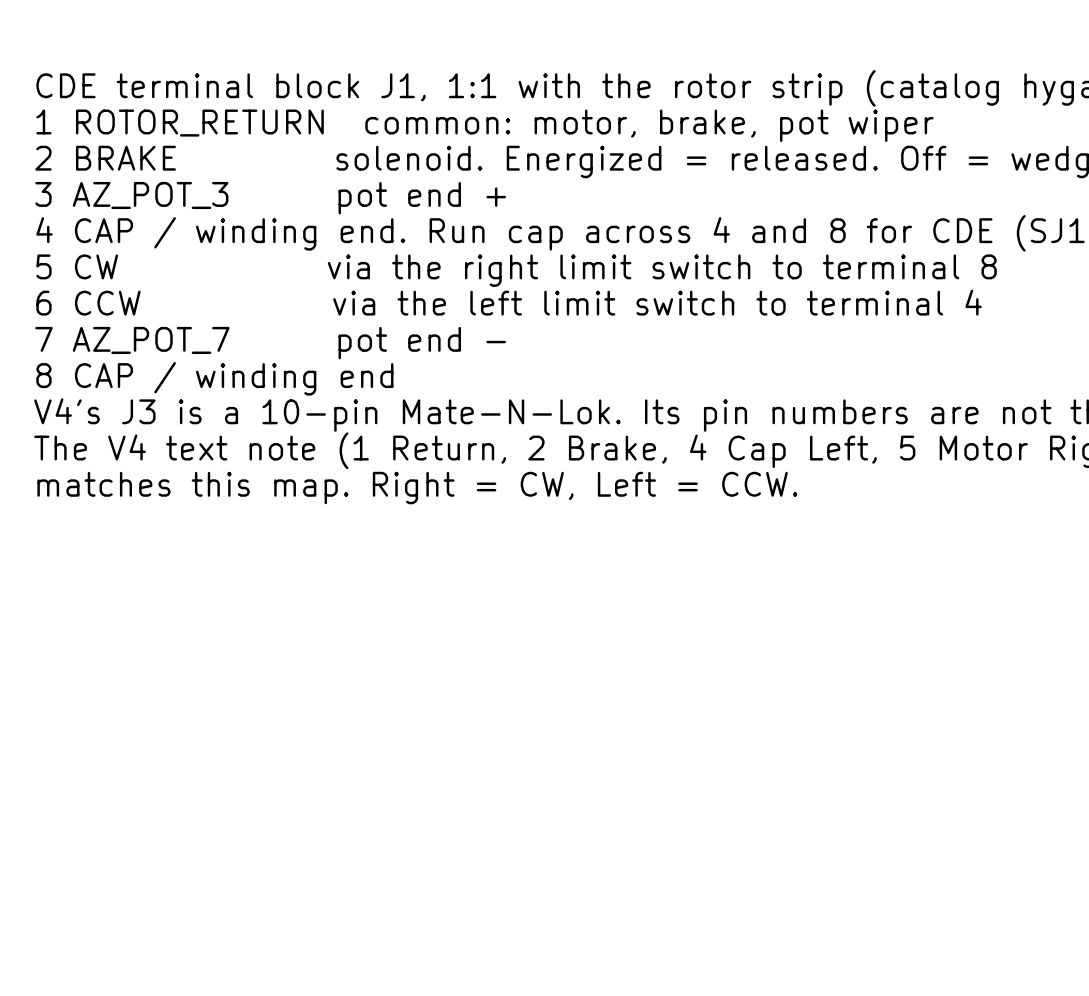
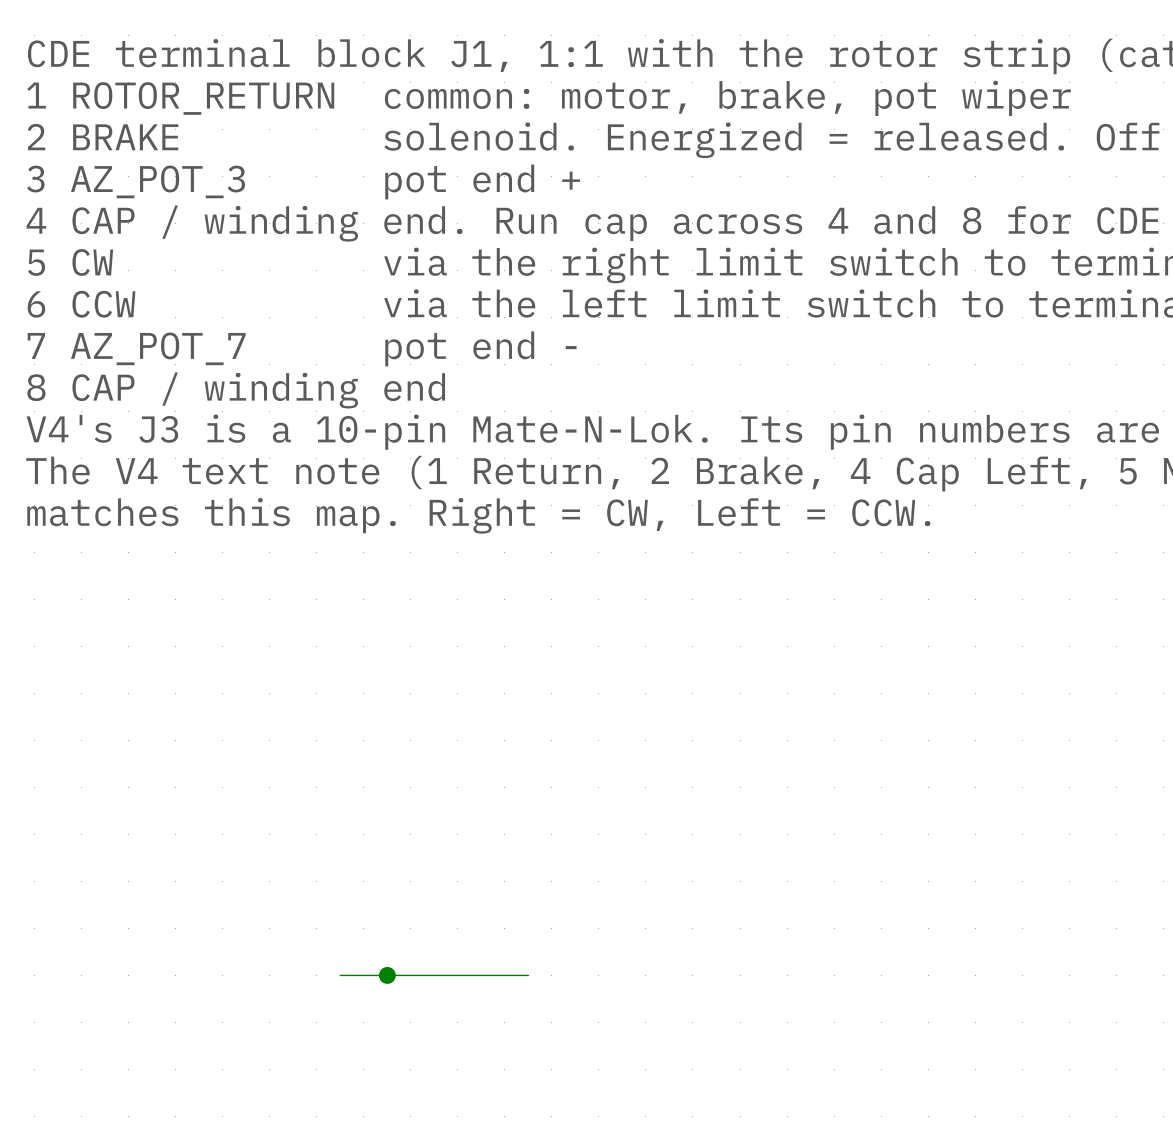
wire: none -> (340, 975) (528, 975)
junction: none -> (387, 975)

